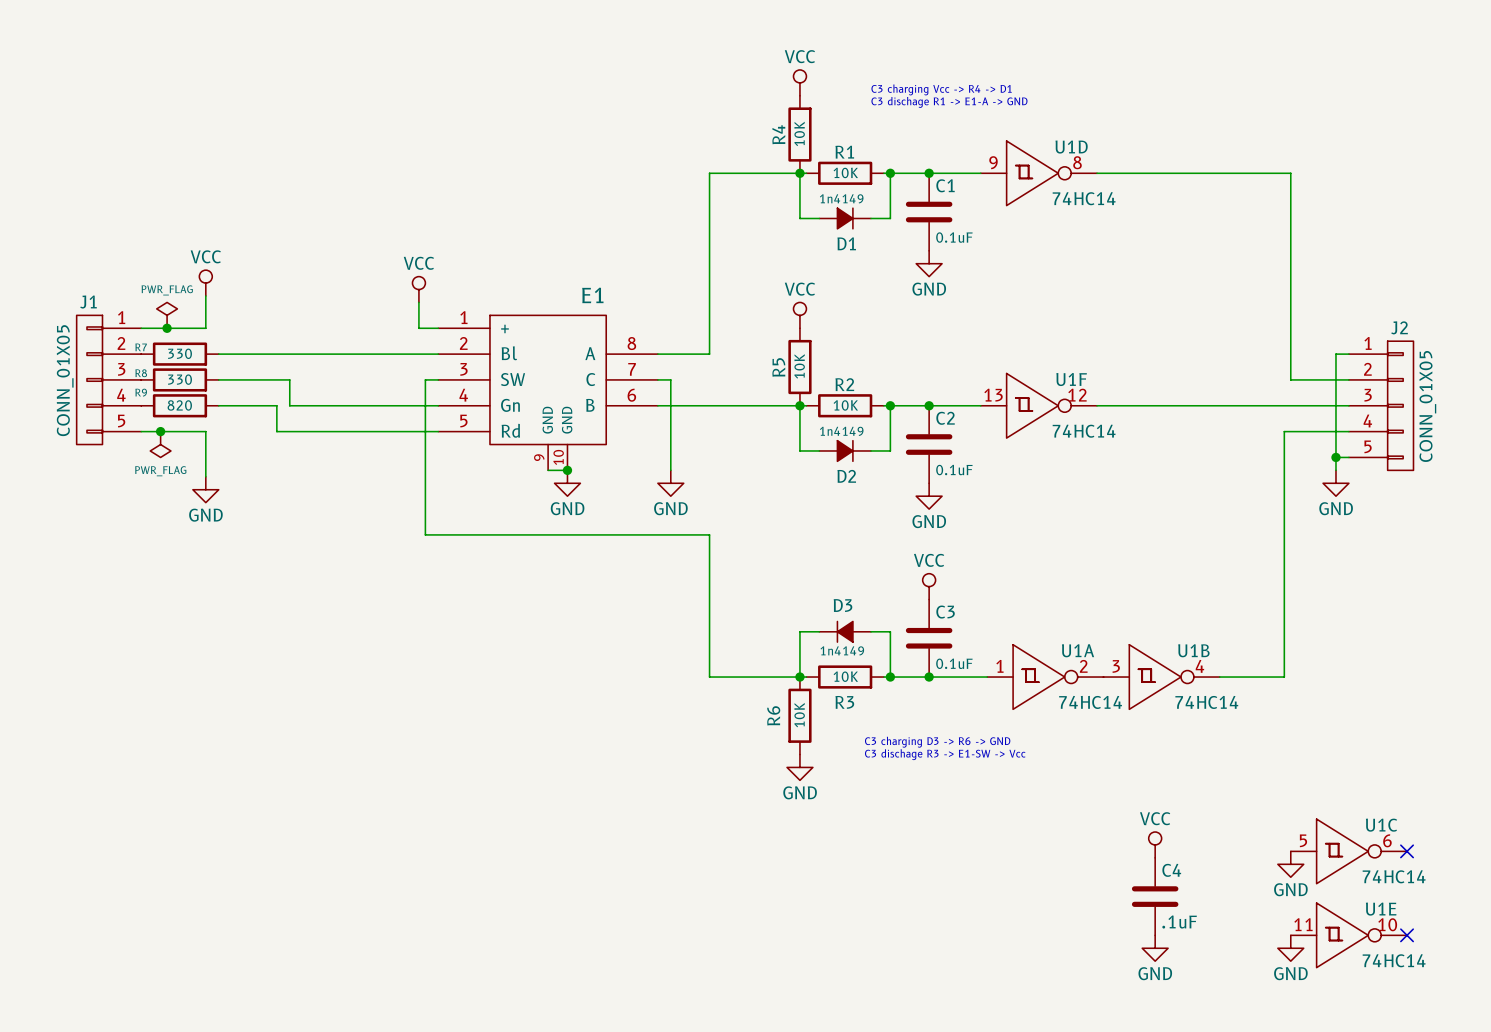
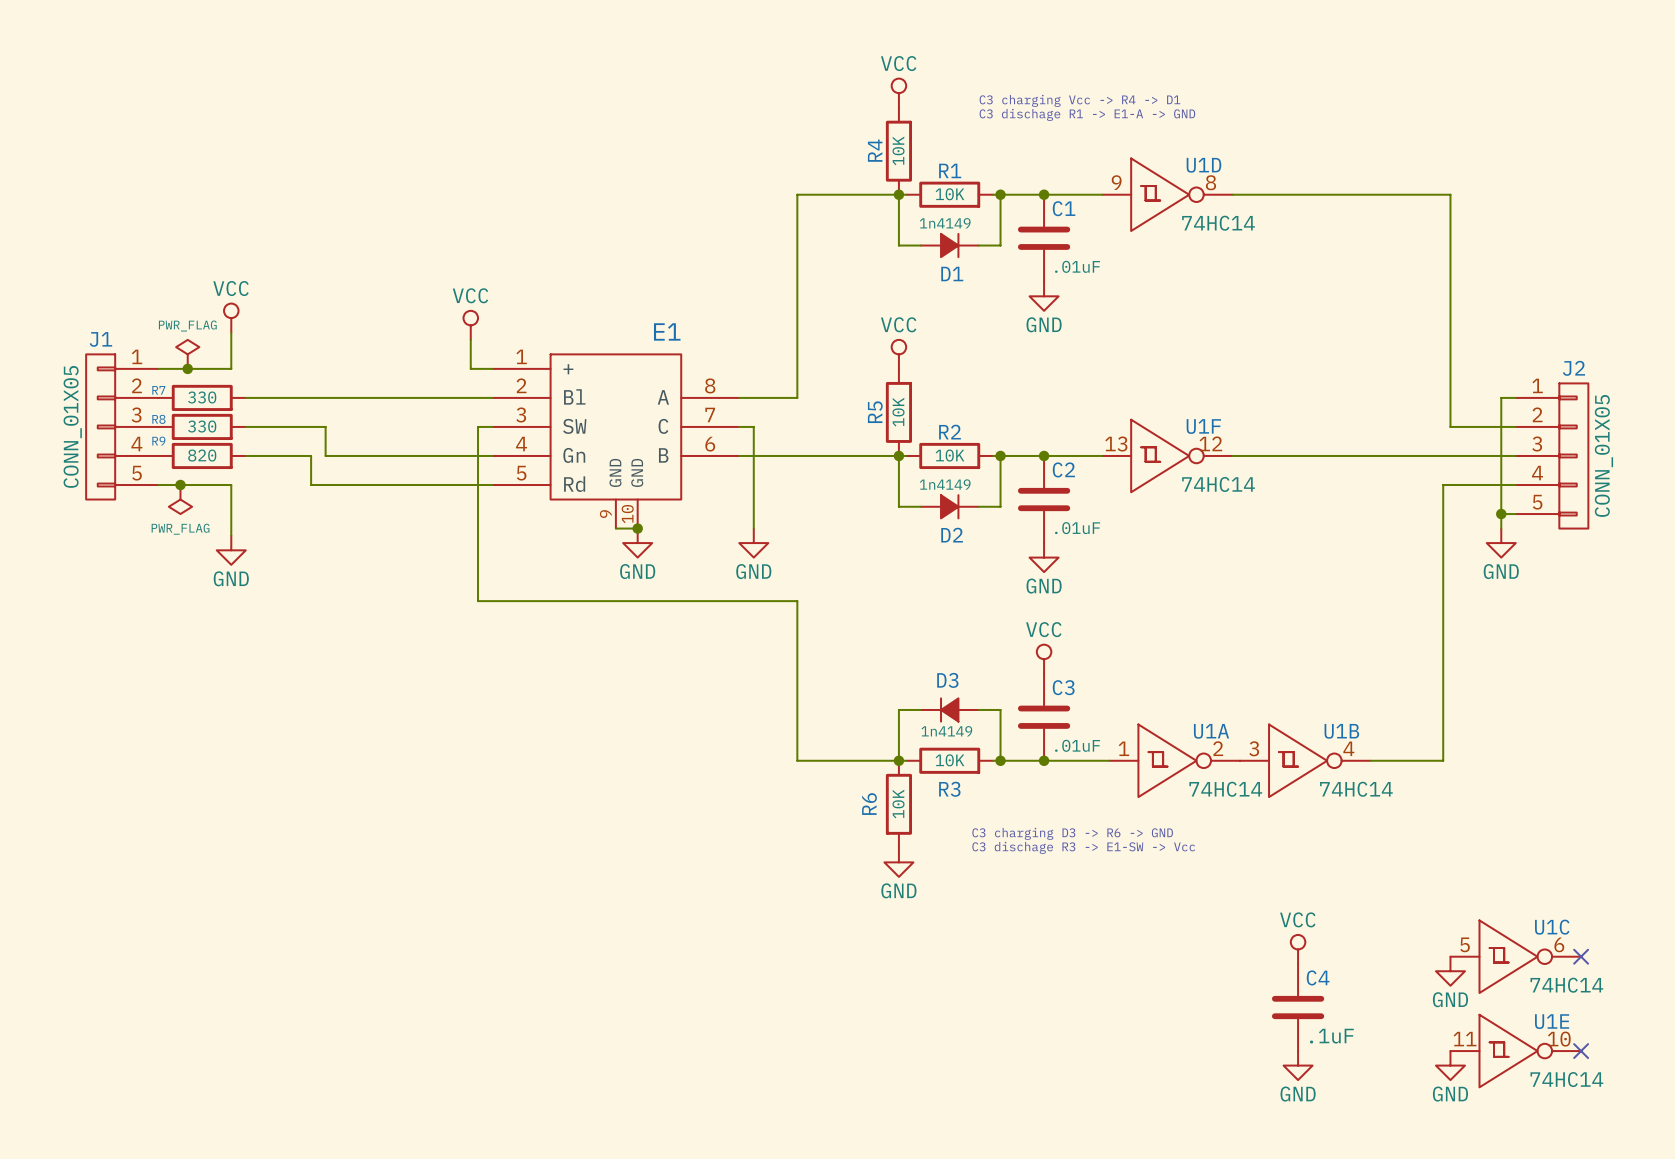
C1 value: 0.1uF (954, 237) -> .01uF (1077, 266)
C2 value: 0.1uF (954, 470) -> .01uF (1077, 528)
C3 value: 0.1uF (954, 663) -> .01uF (1077, 745)

